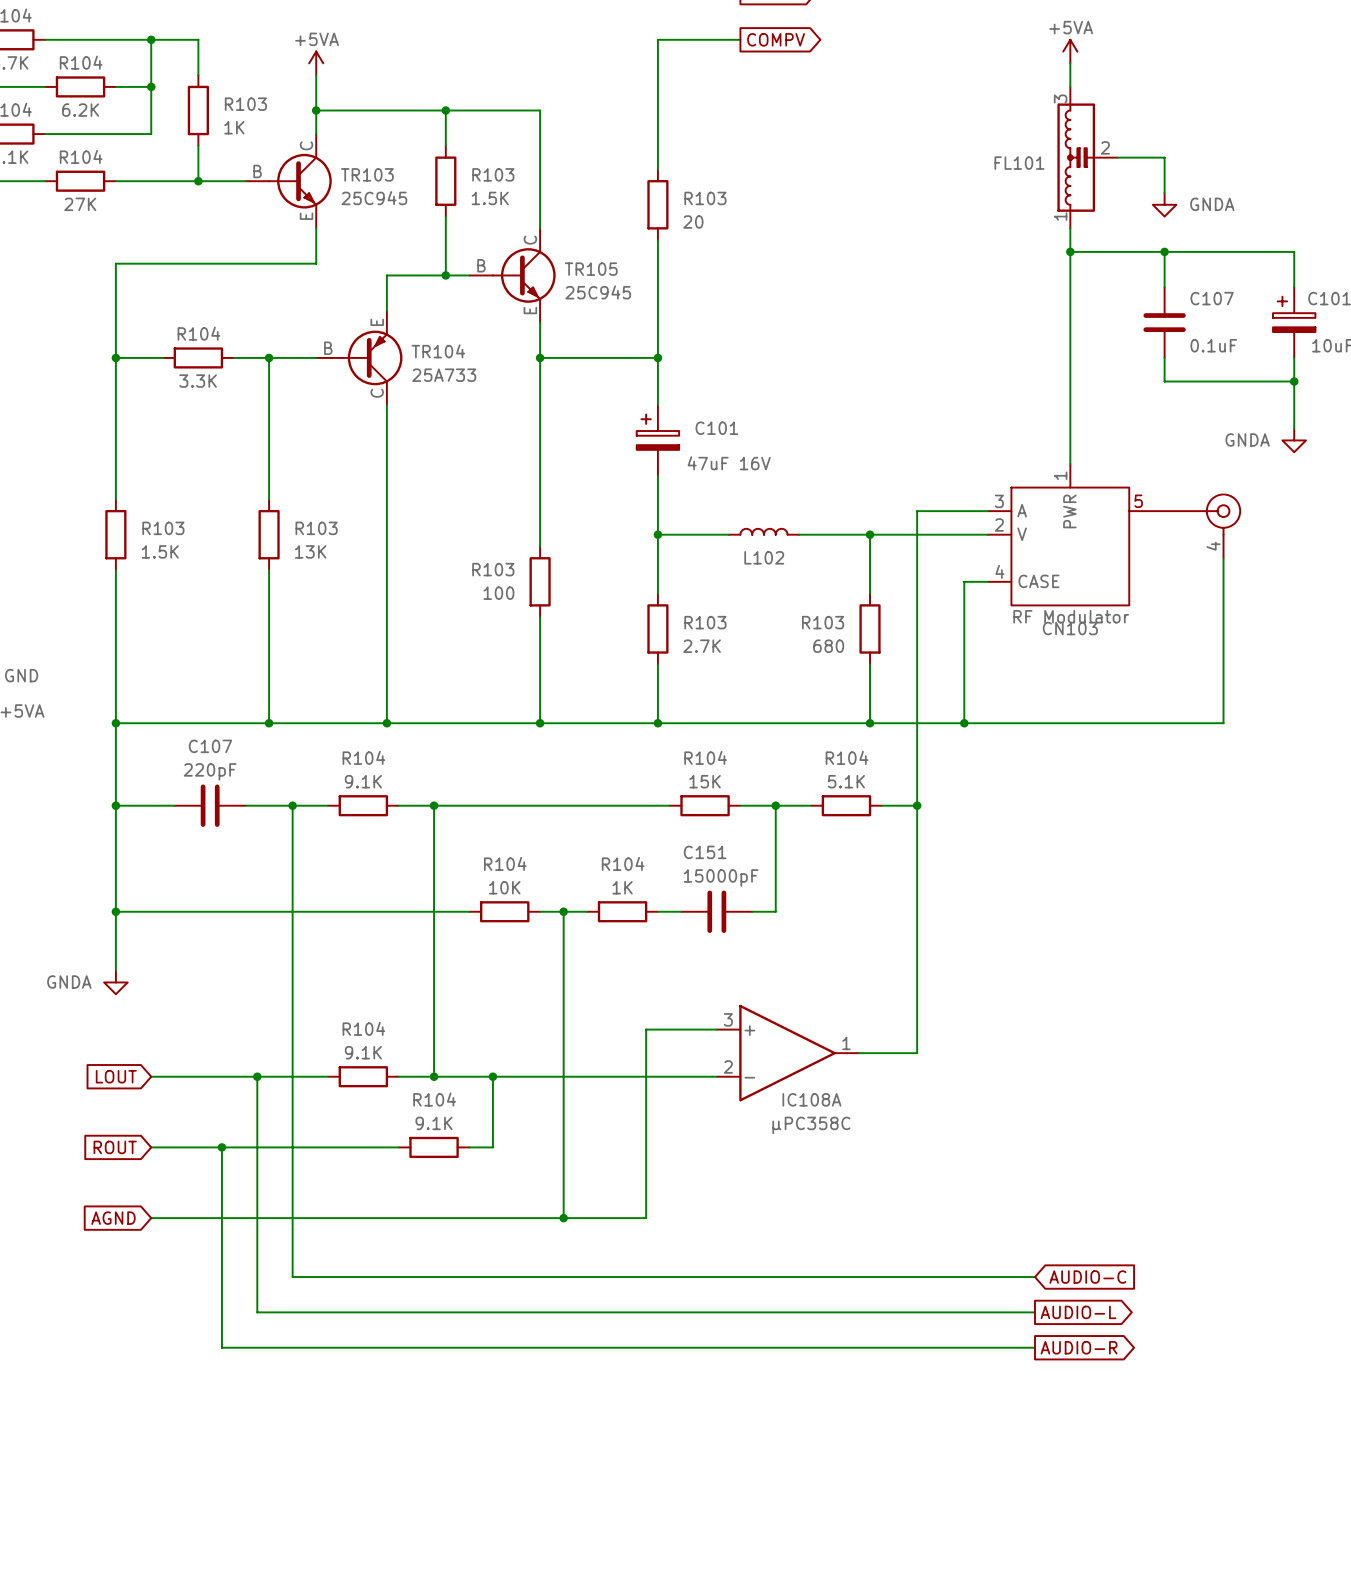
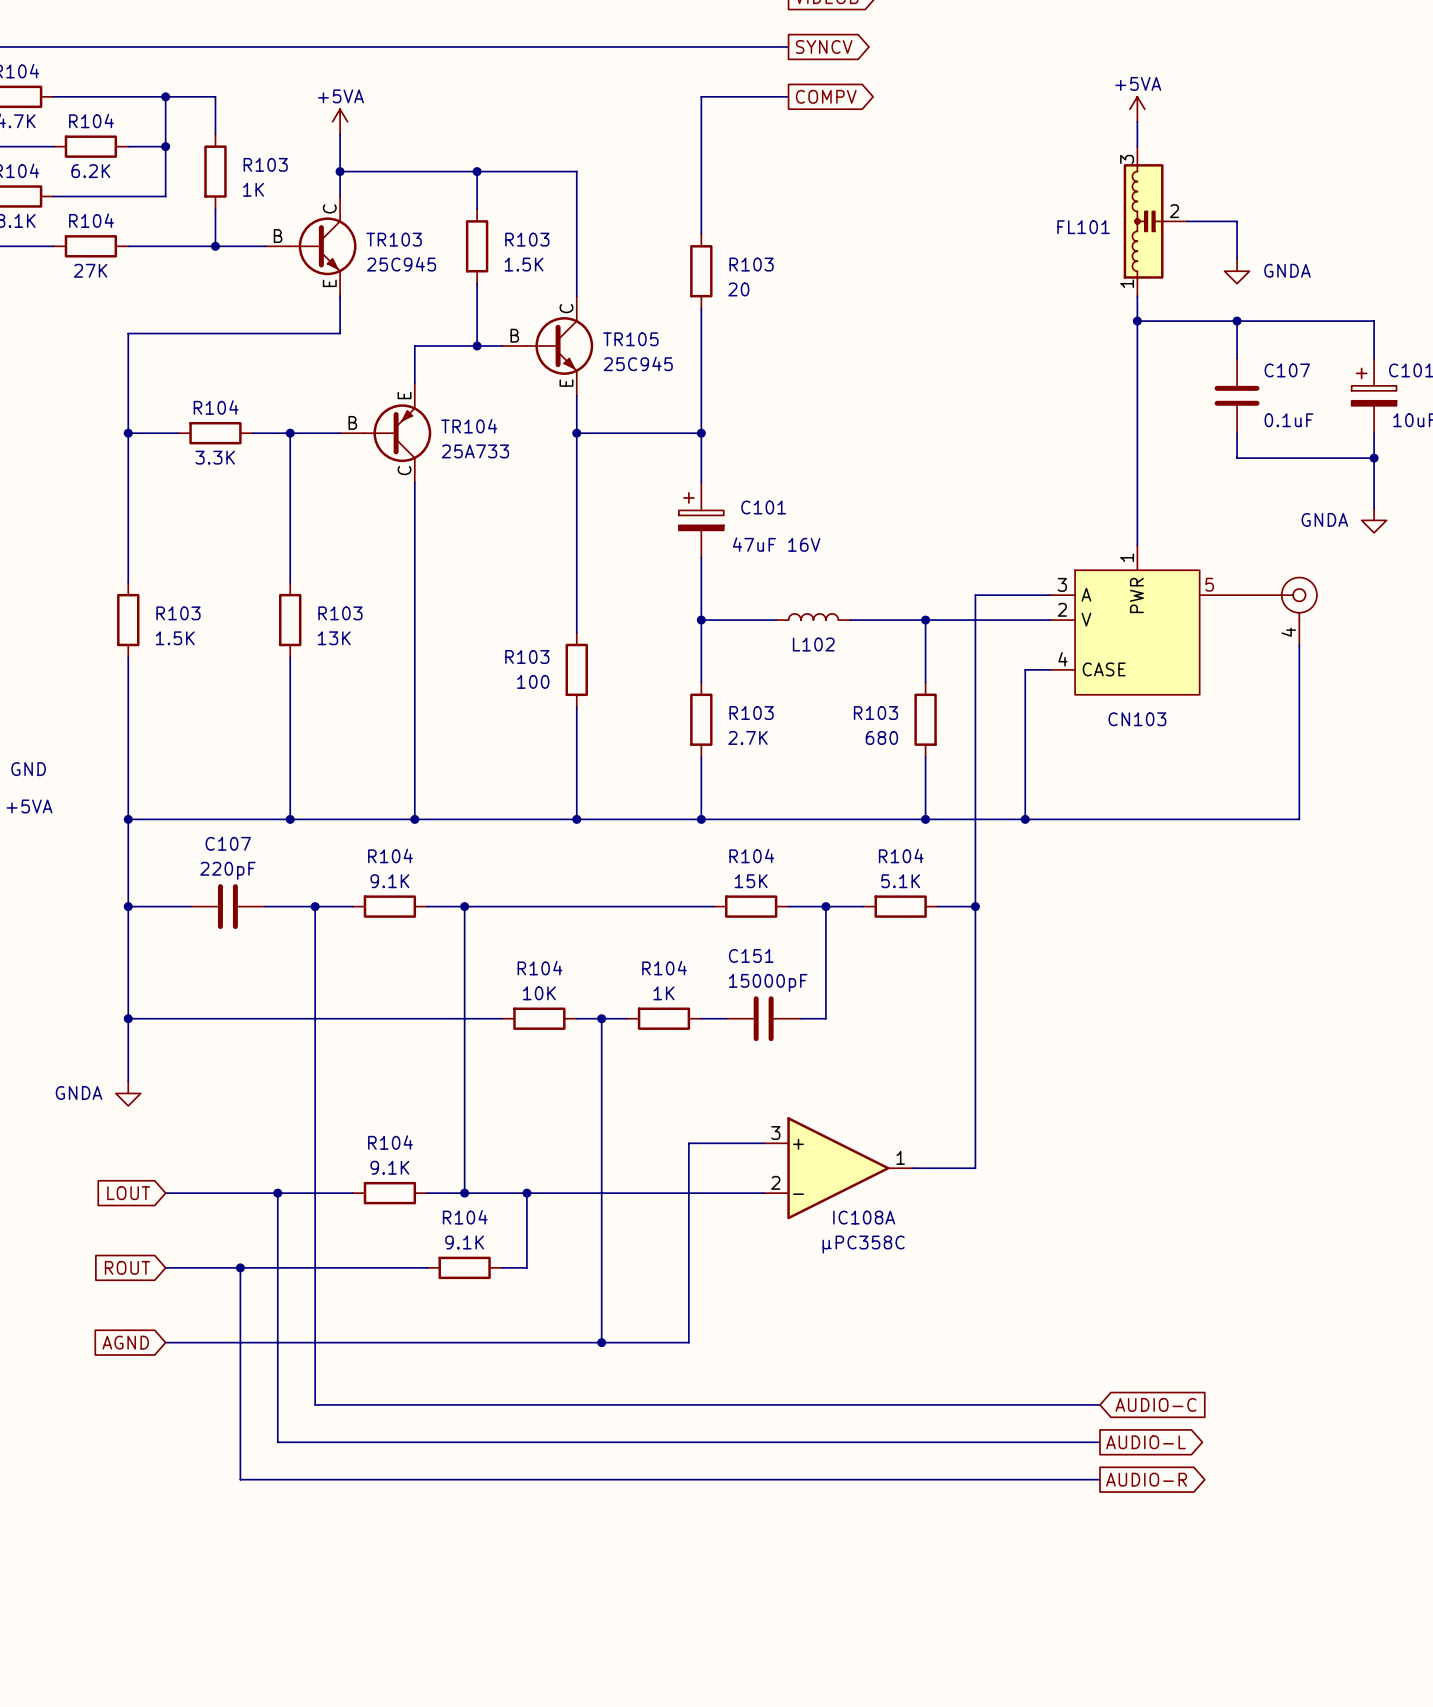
CN103 value: RF Modulator (1071, 616) -> none

